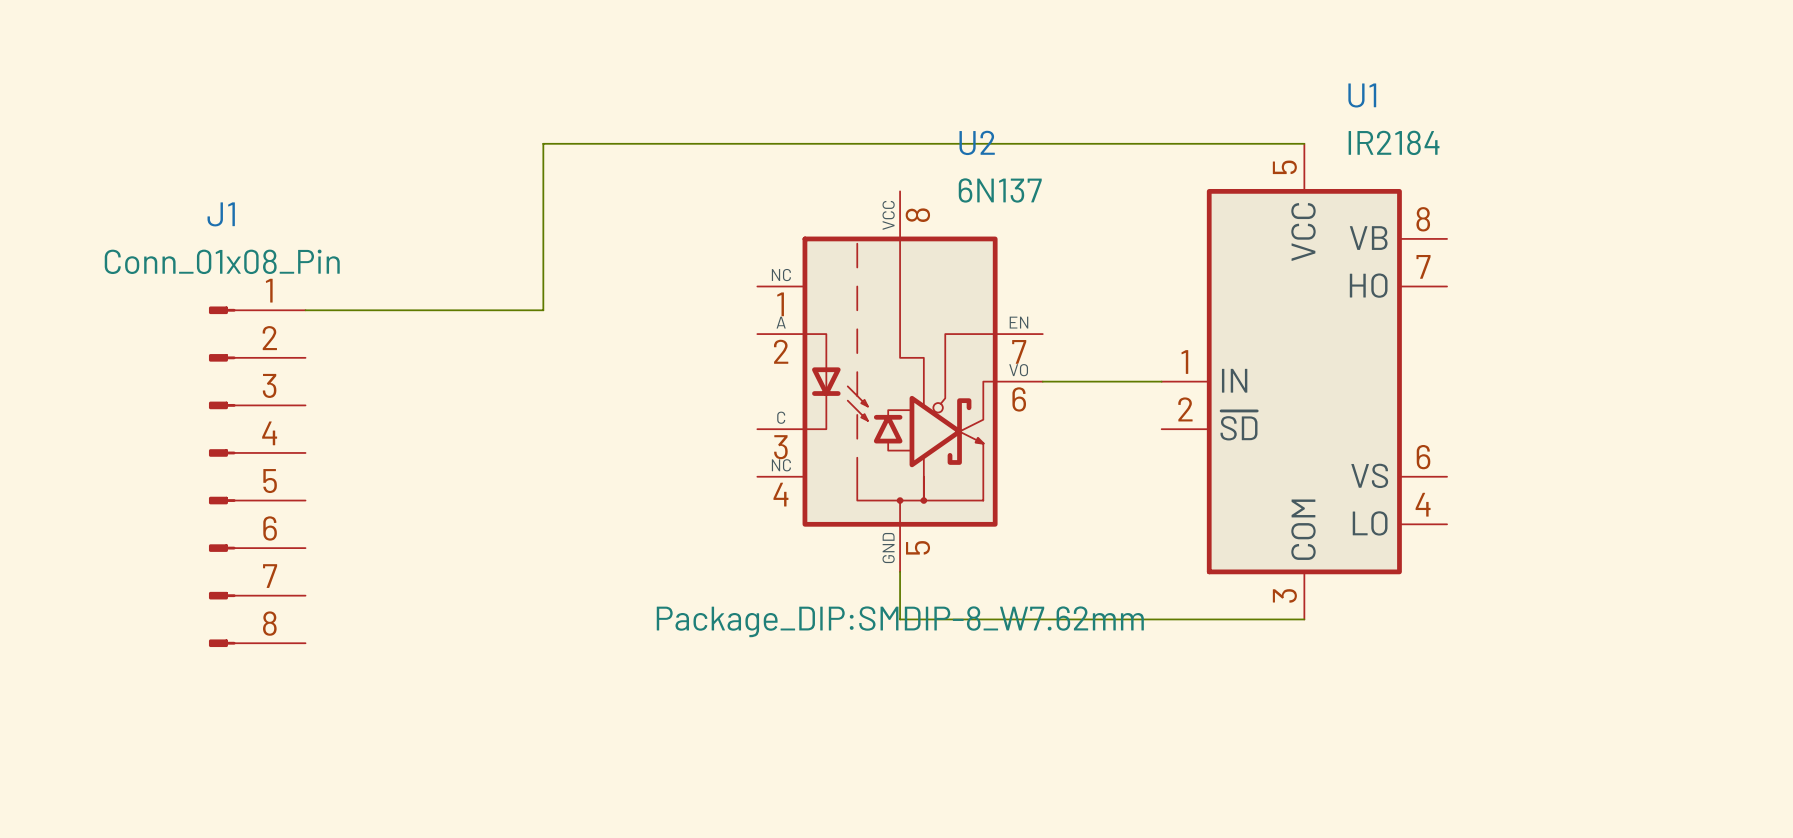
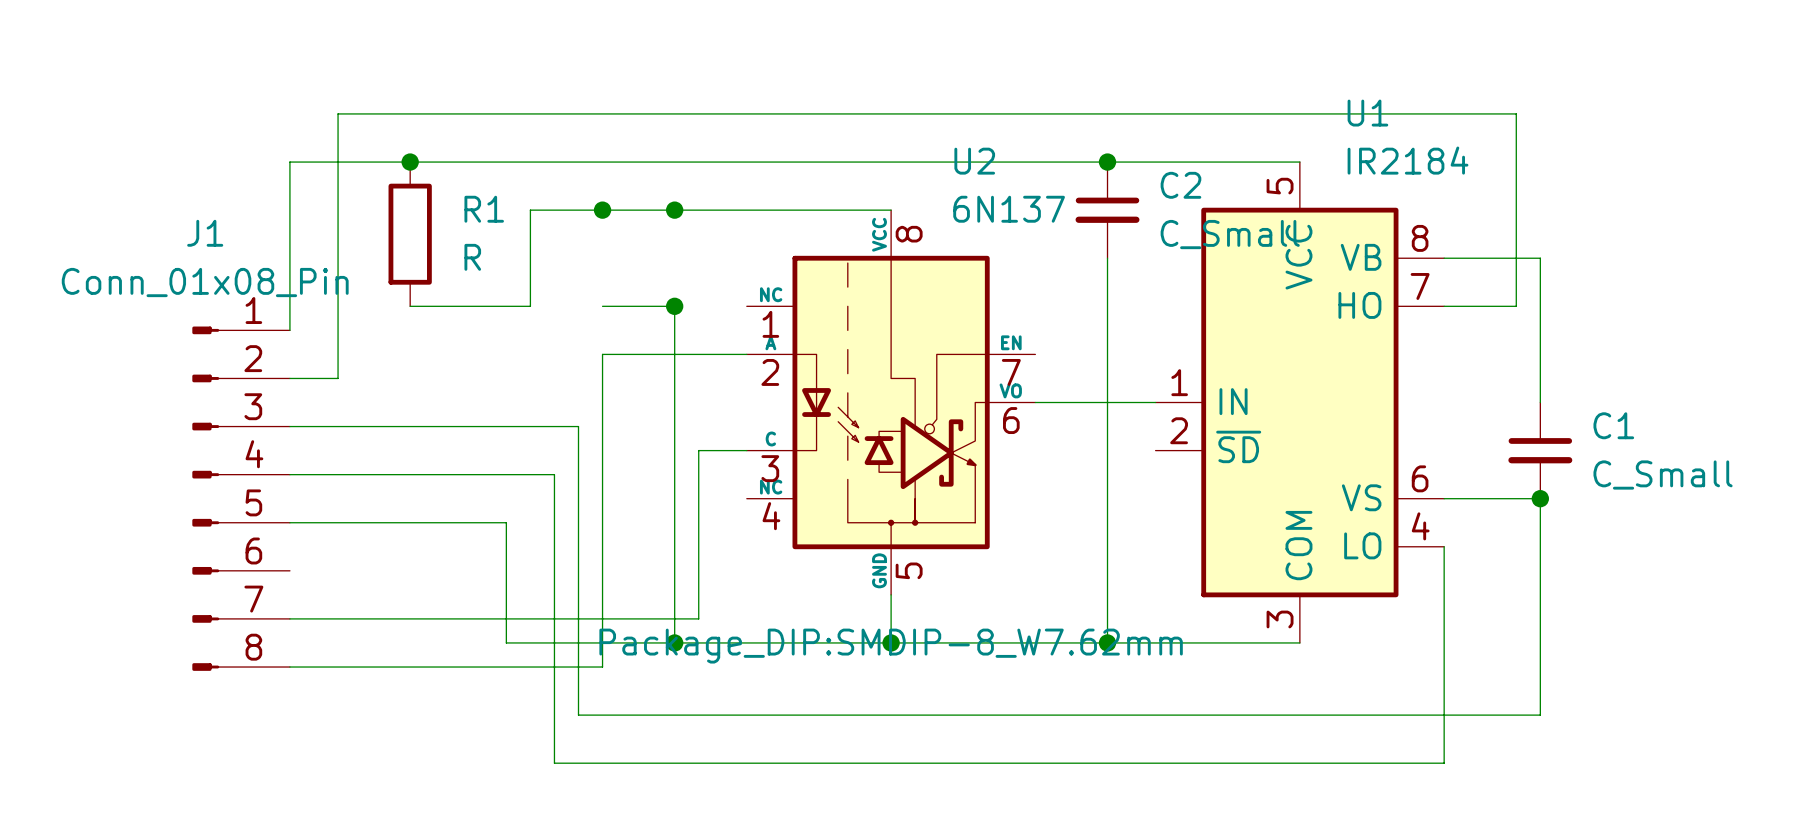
junction: none -> (410, 162)
wire: (543, 143) (543, 191) -> (530, 162) (289, 162) (289, 330)
junction: none -> (1107, 162)
wire: none -> (530, 210) (891, 210)
junction: none -> (602, 210)
junction: none -> (674, 210)
C2: none -> C_Small (1107, 210)
R1: none -> R (410, 234)
wire: none -> (1107, 258) (1107, 642)
wire: none -> (1444, 258) (1540, 258) (1540, 402)
wire: (543, 286) (543, 310) (305, 310) -> (530, 306) (410, 306)
wire: none -> (602, 306) (674, 306) (674, 642)
junction: none -> (674, 306)
wire: none -> (1444, 306) (1516, 306) (1516, 113) (338, 113) (338, 378) (289, 378)
wire: none -> (746, 354) (602, 354) (602, 667) (289, 667)
wire: none -> (289, 426) (578, 426) (578, 715) (1540, 715) (1540, 498) (1444, 498)
wire: none -> (746, 450) (698, 450) (698, 618) (289, 618)
C1: none -> C_Small (1540, 450)
wire: none -> (289, 474) (554, 474) (554, 763) (1444, 763) (1444, 546)
junction: none -> (1540, 498)
wire: none -> (289, 522) (506, 522) (506, 642) (891, 642)
junction: none -> (674, 642)
junction: none -> (891, 642)
junction: none -> (1107, 642)

